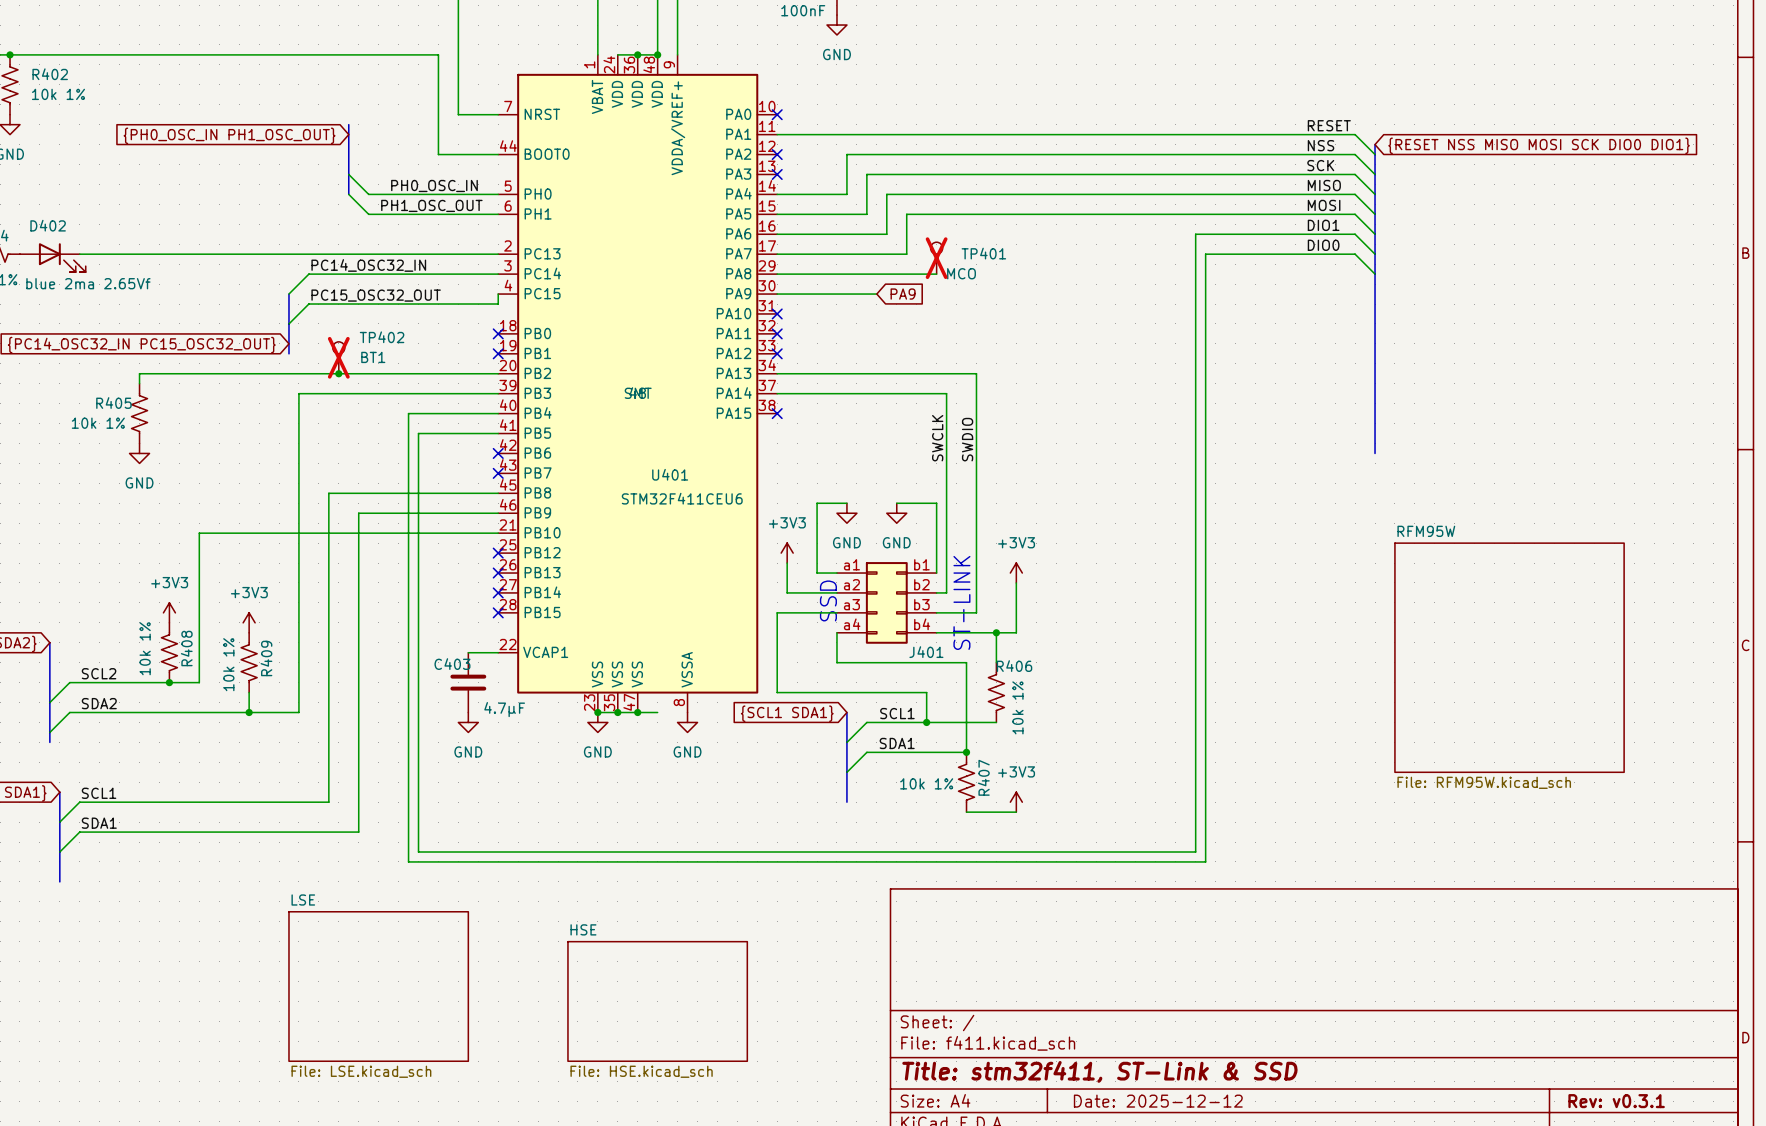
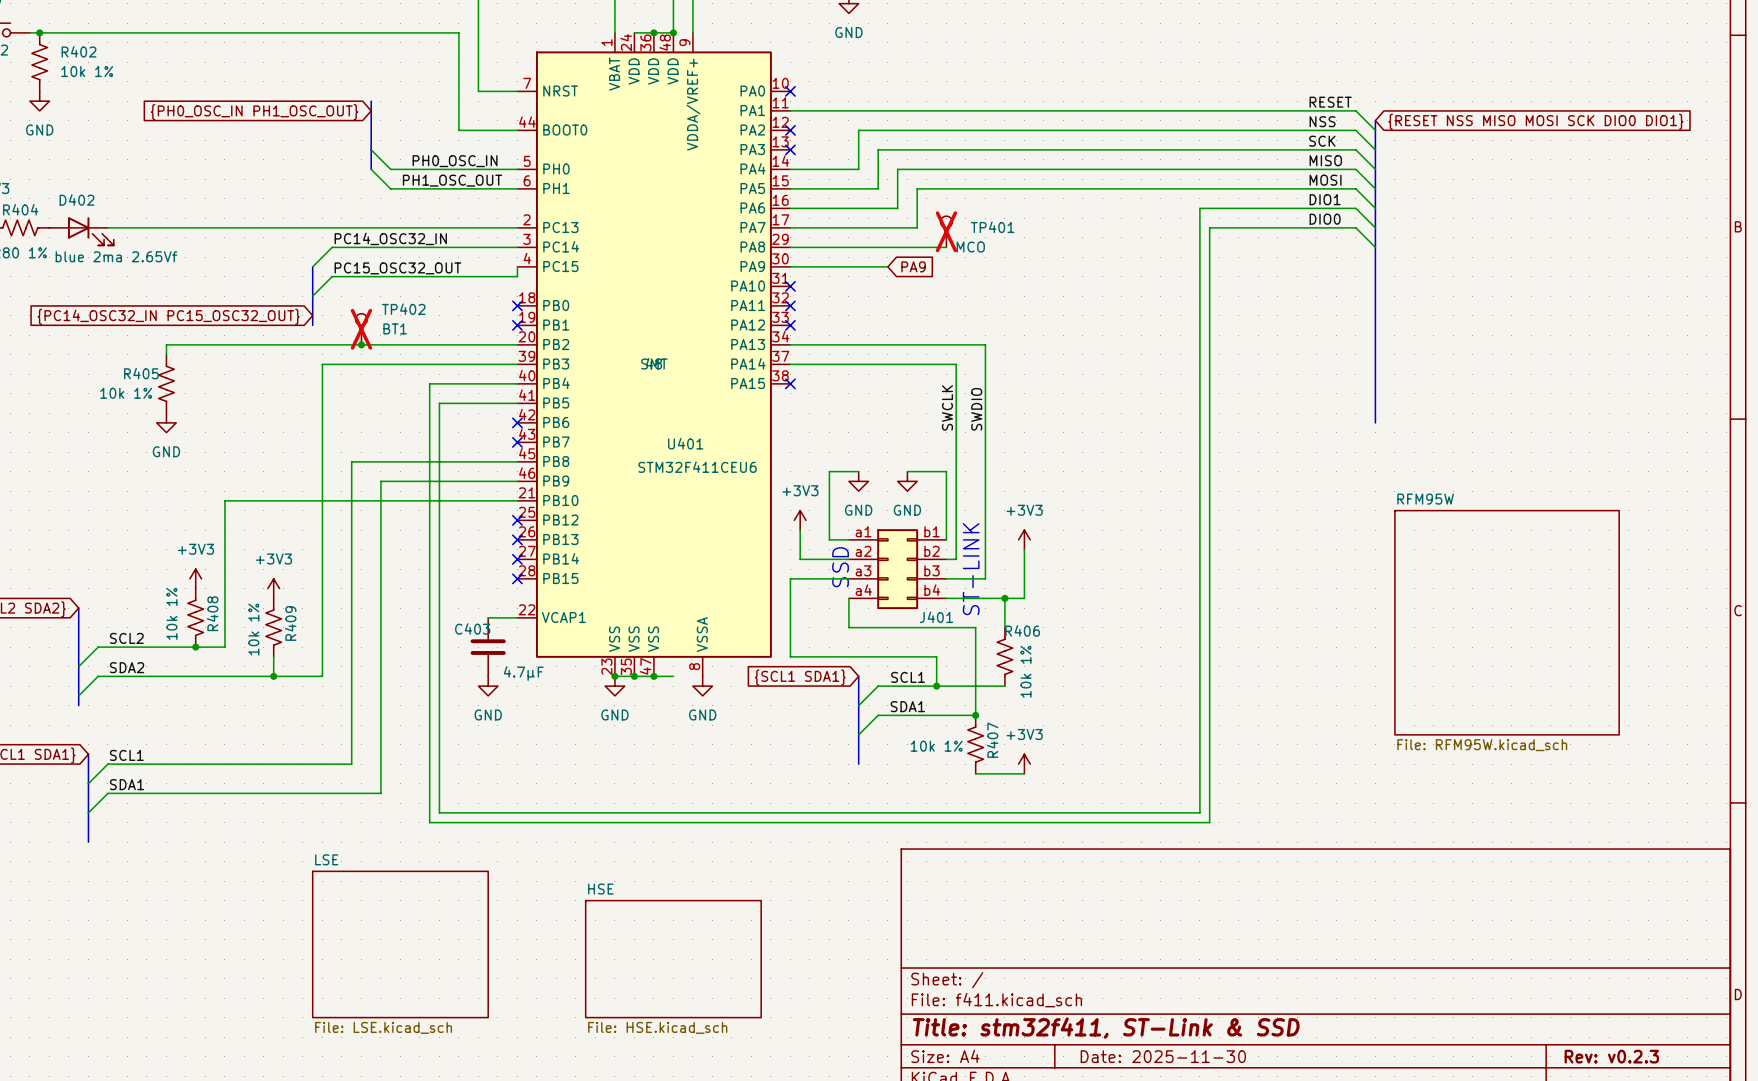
title block: Date: 2025-12-12 (1158, 1101) -> Date: 2025-11-30 (1163, 1056)
title block: Rev: v0.3.1 (1616, 1101) -> Rev: v0.2.3 (1611, 1056)

